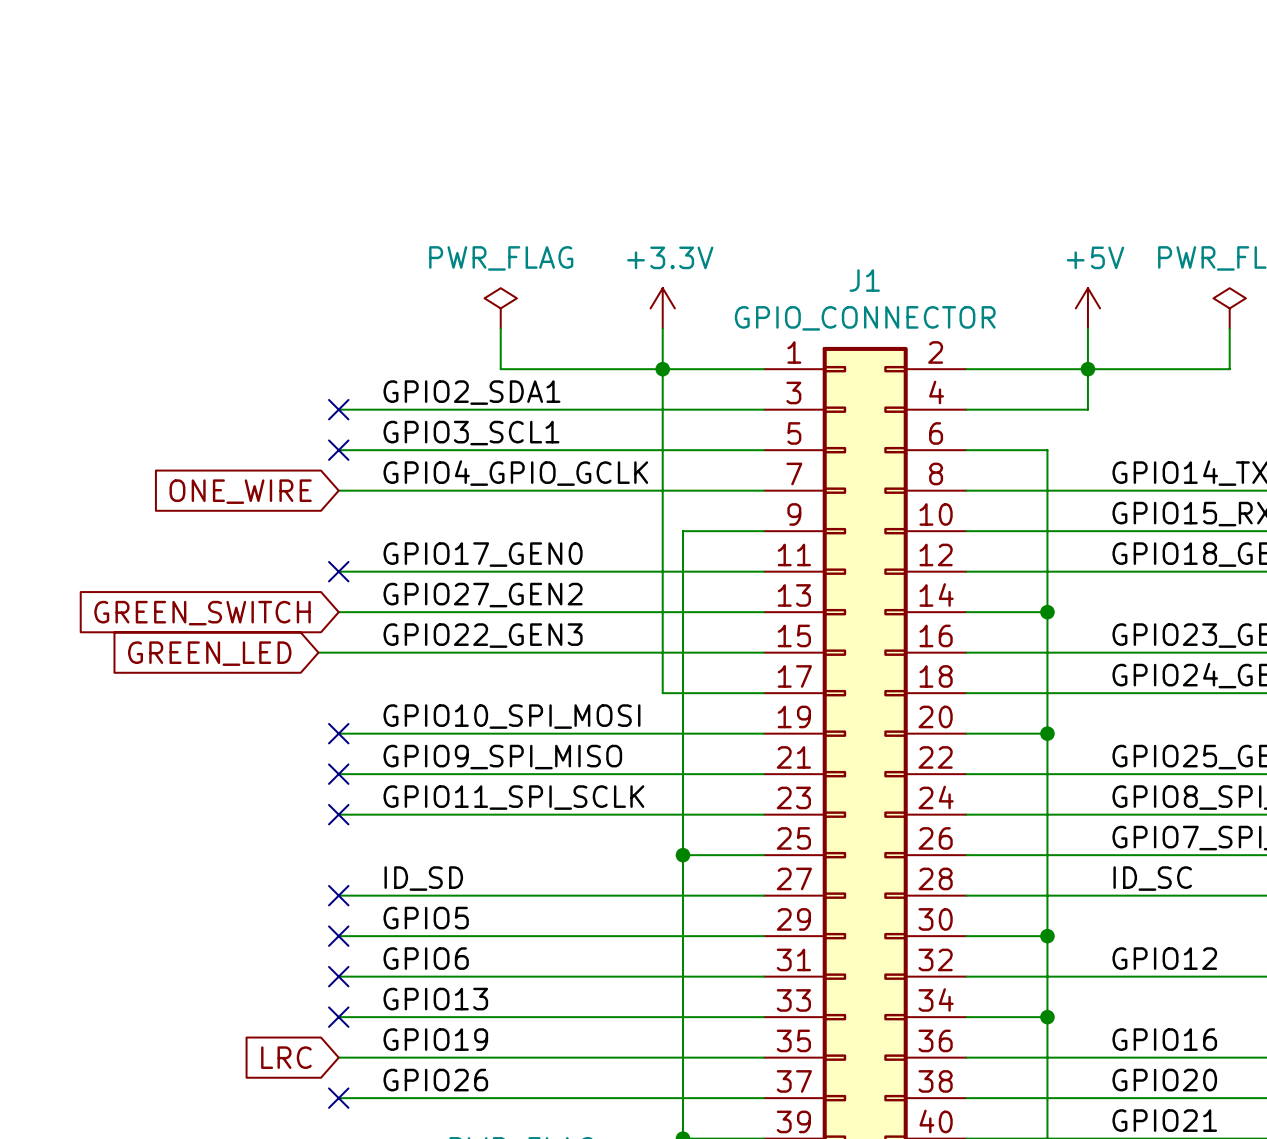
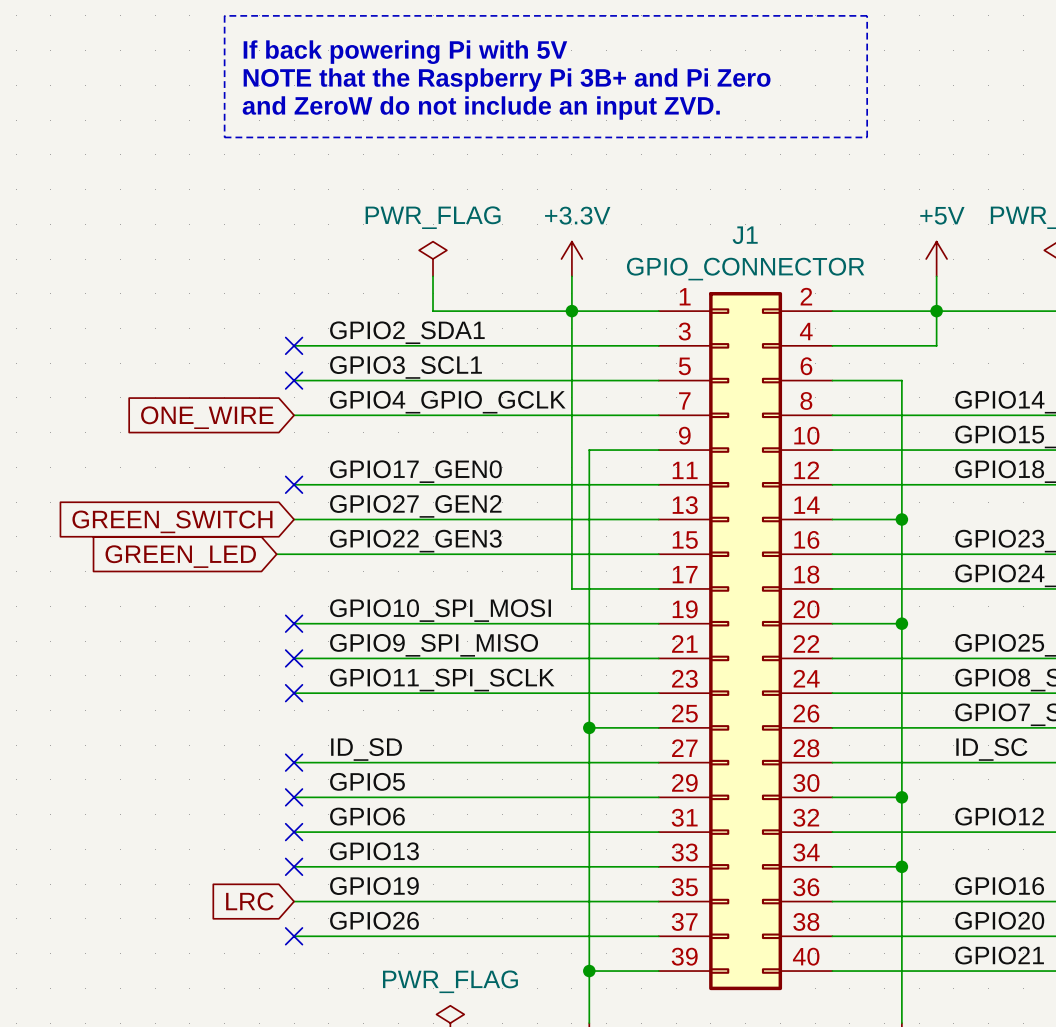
line: none -> (224, 15) (224, 137) (867, 137) (867, 15) (224, 15)
text: none -> If back powering Pi with 5V (405, 52)
text: none -> NOTE that the Raspberry Pi 3B+ and Pi Zero (507, 80)
text: none -> and ZeroW do not include an input ZVD. (481, 108)

